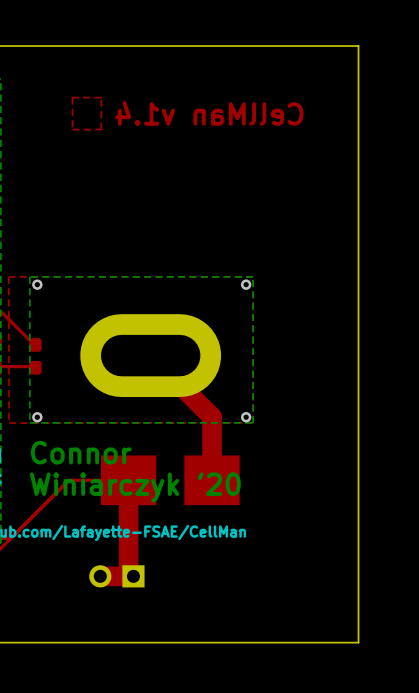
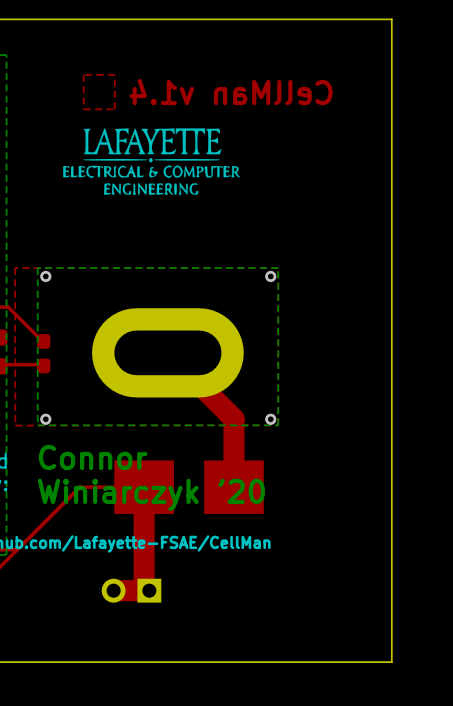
drawing: none -> [63, 128, 240, 196]

